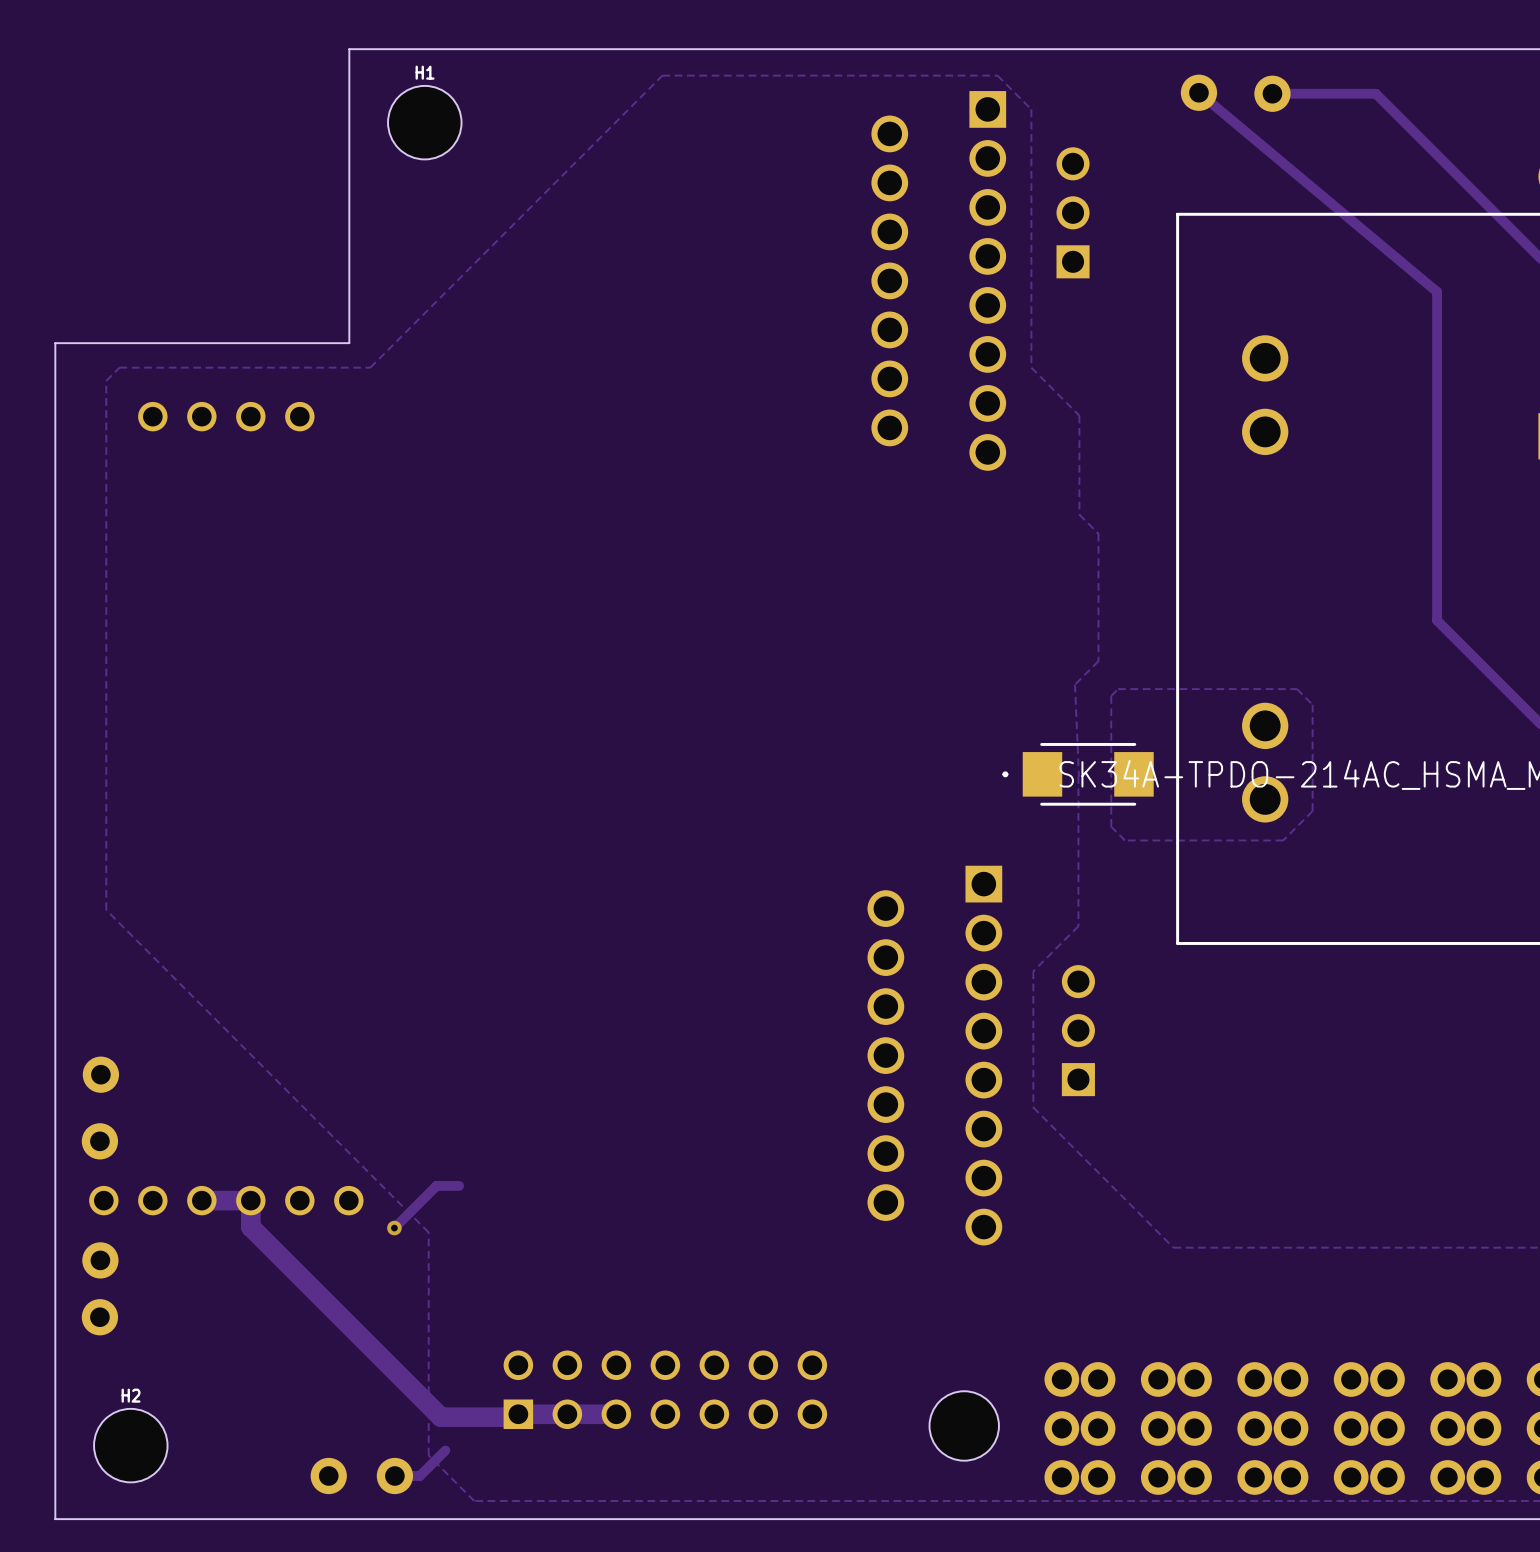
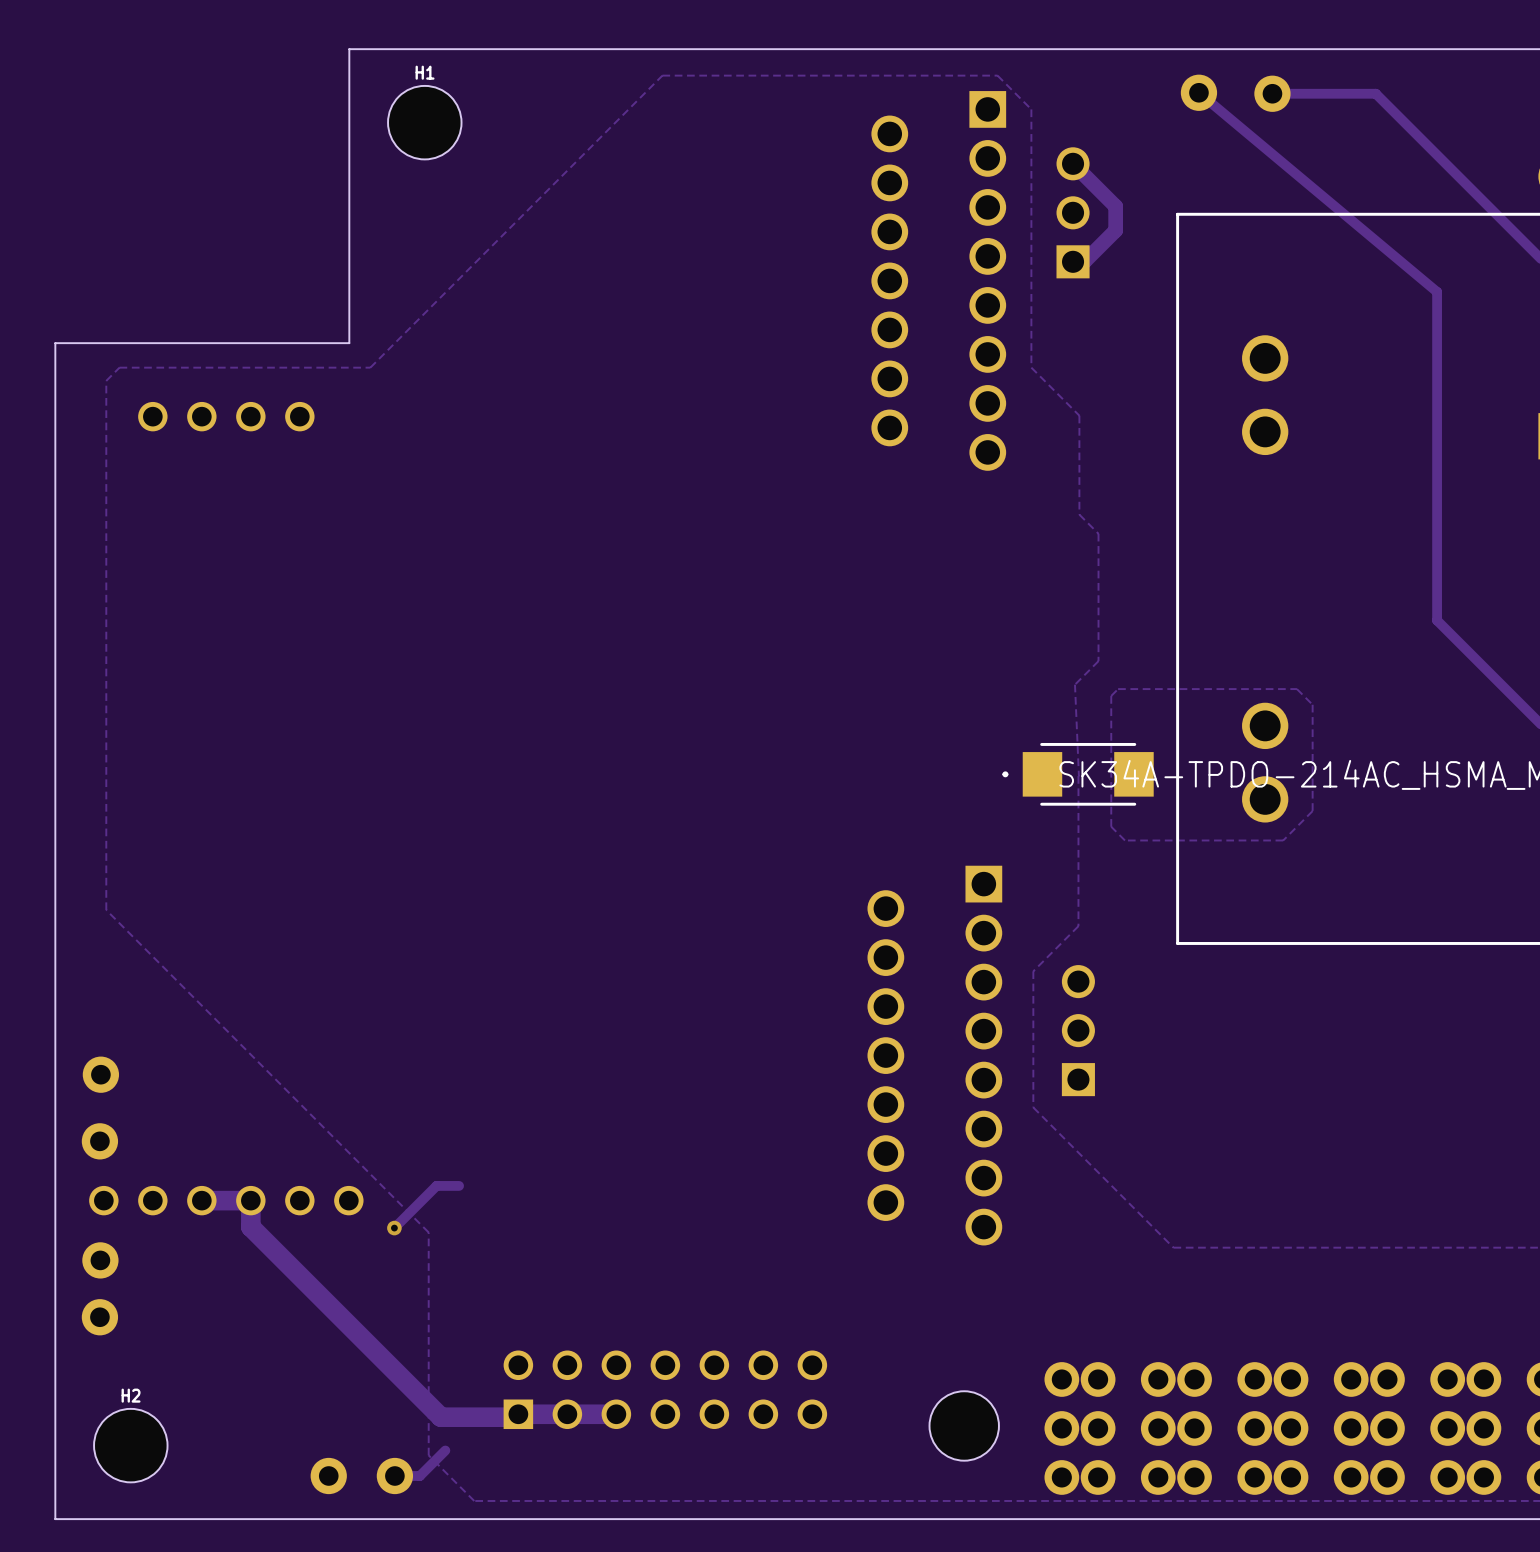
track: none -> (1073, 163) (1115, 206) (1115, 230) (1084, 261) (1073, 261)

